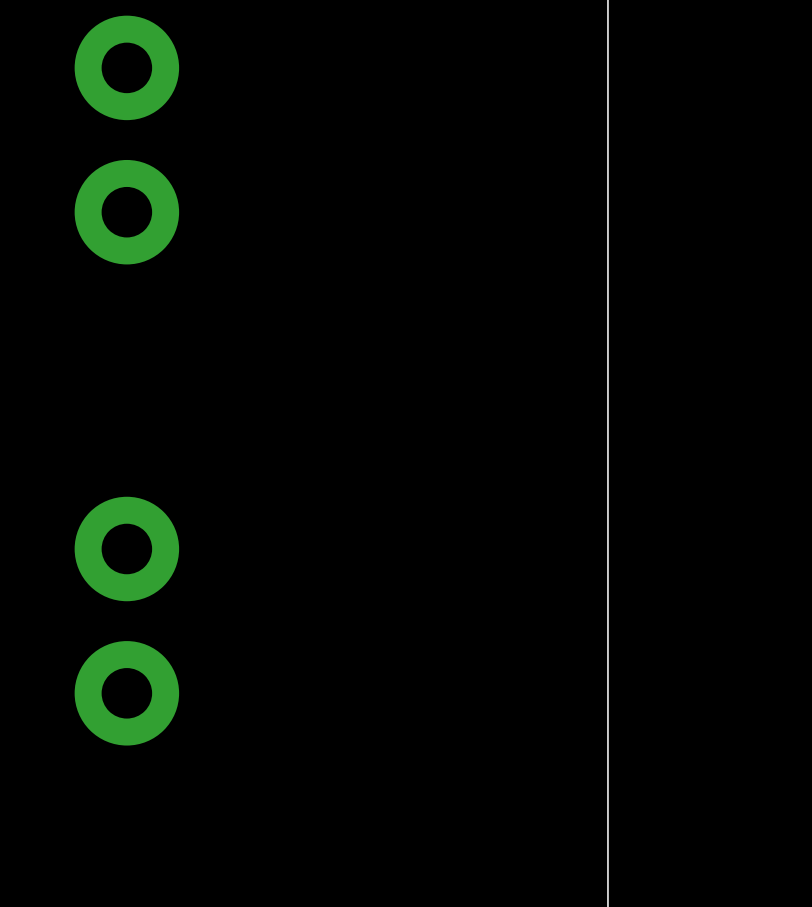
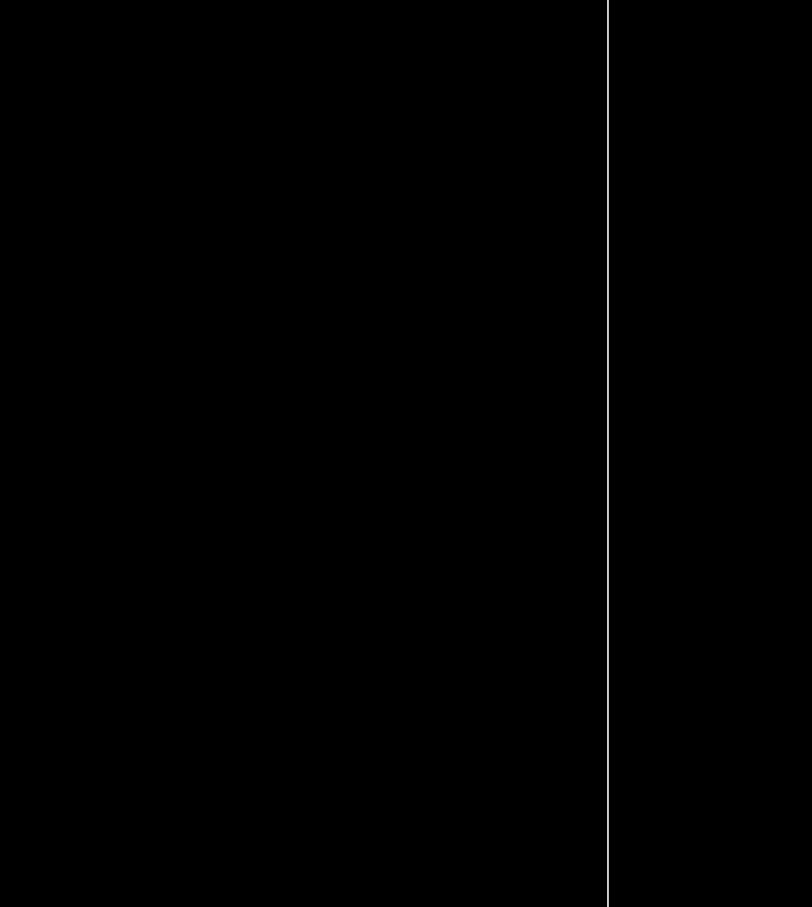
part: (126, 140) -> none
part: (126, 621) -> none

